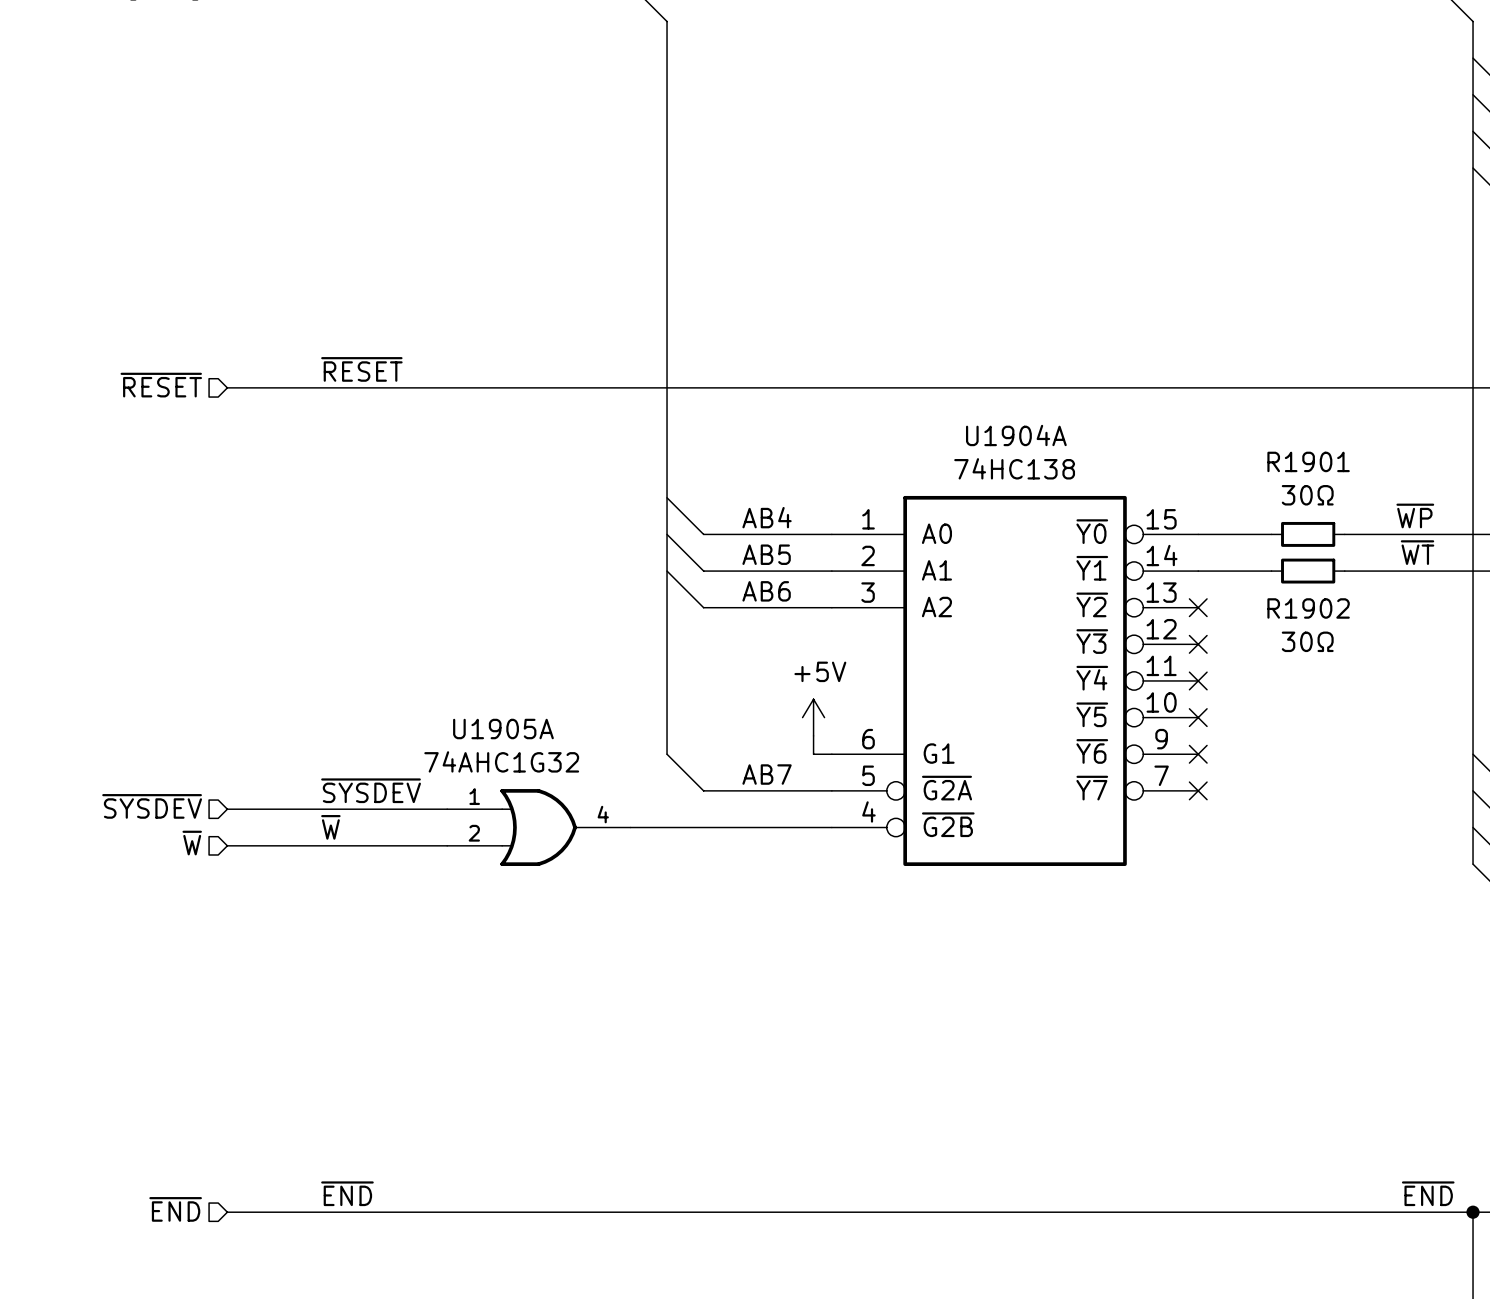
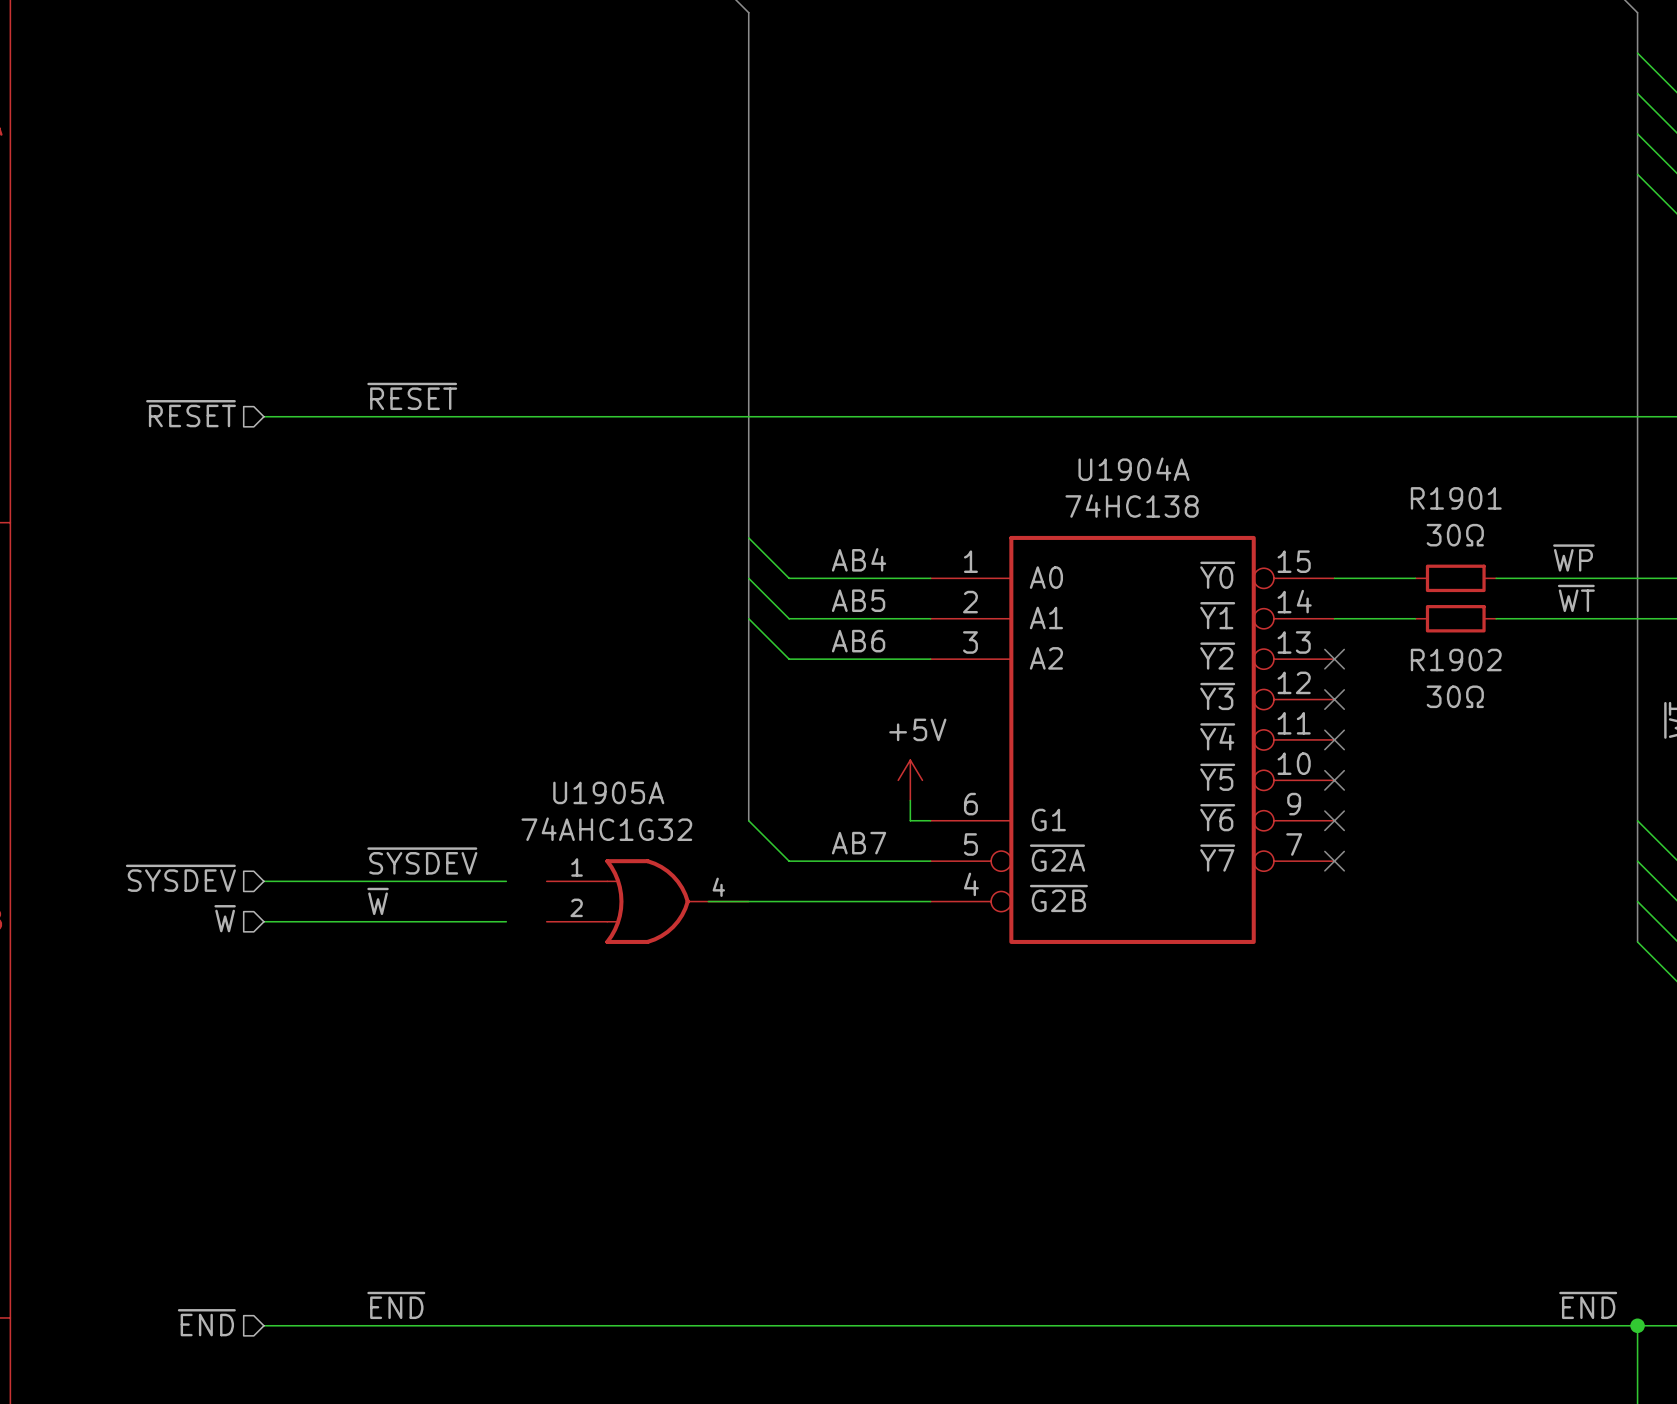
U1905A position: (538, 827) -> (647, 901)

